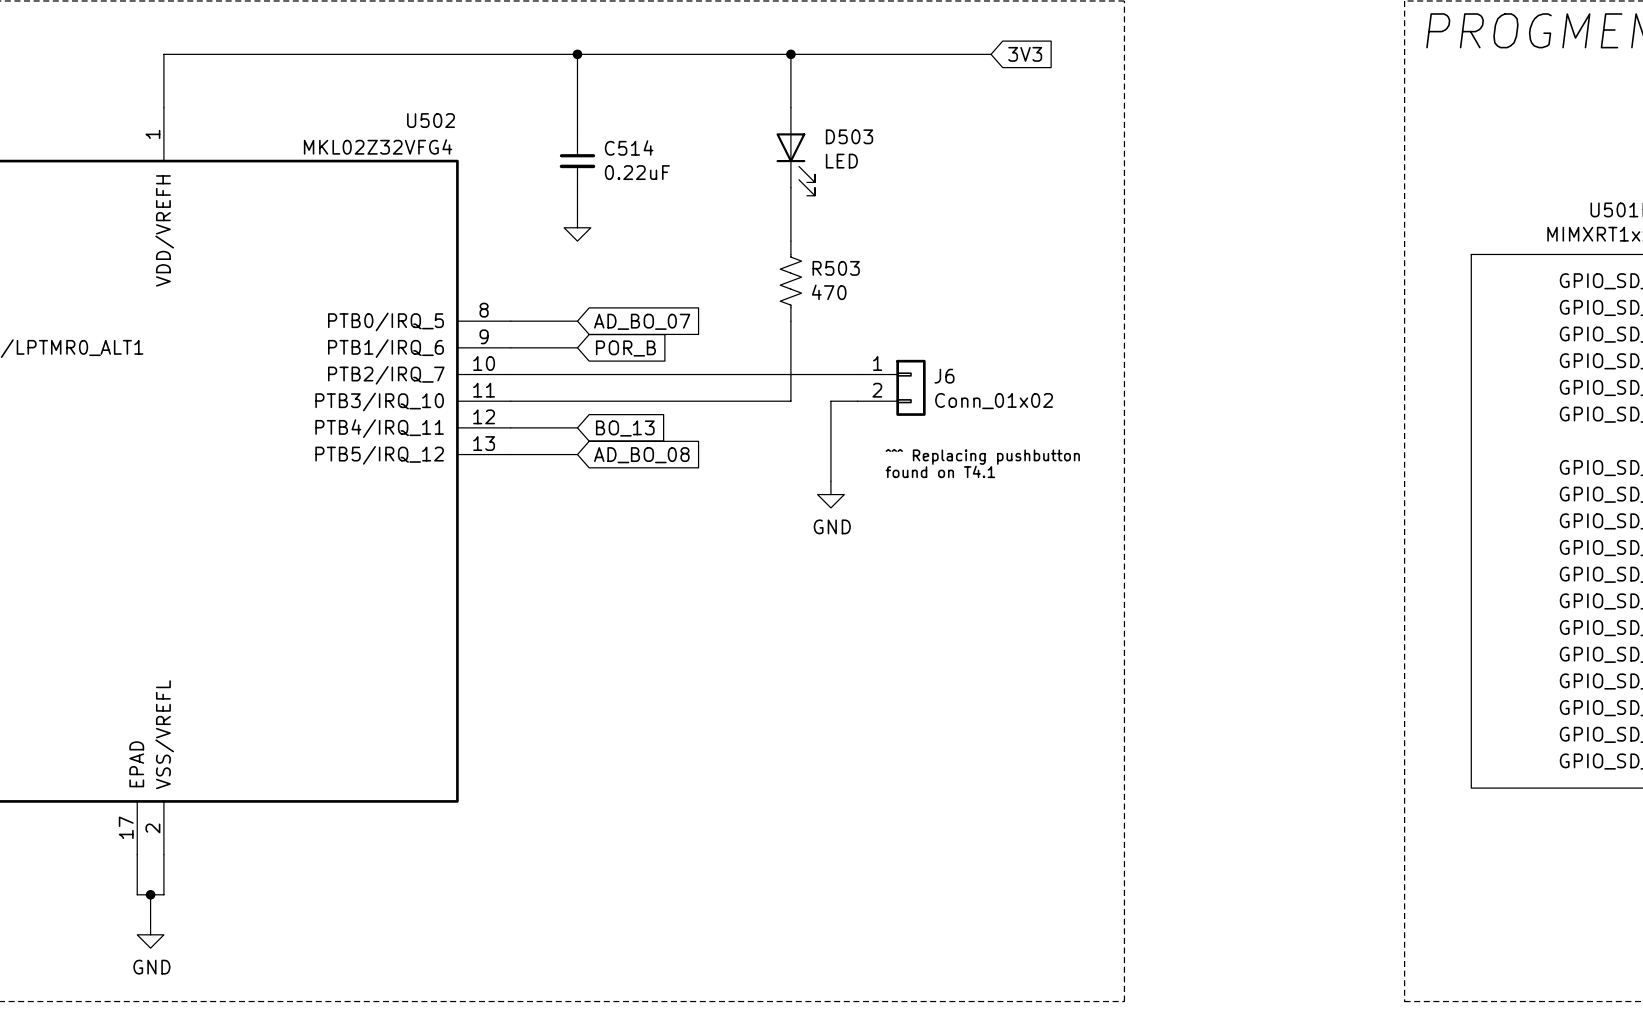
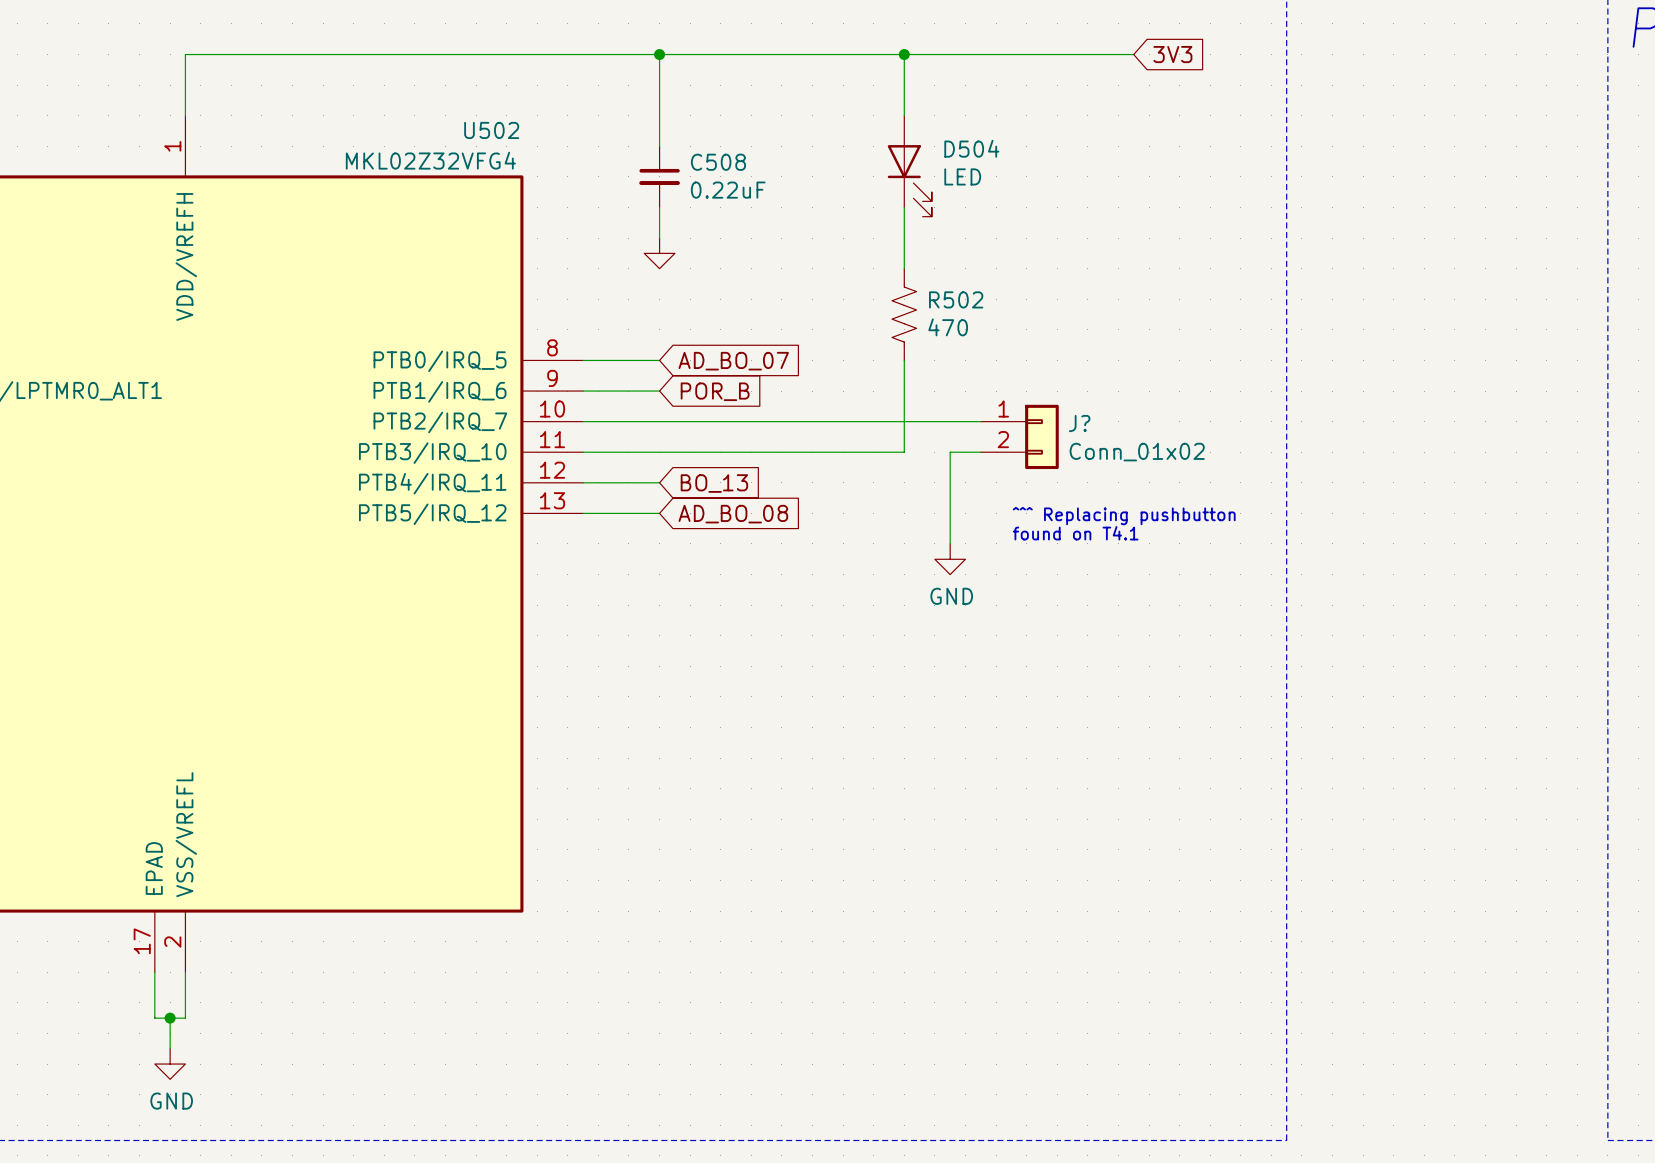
D503 name: D503 (849, 136) -> D504 (971, 148)
C514 name: C514 (629, 147) -> C508 (718, 162)
R503 name: R503 (836, 268) -> R502 (956, 299)
J6 name: J6 (944, 376) -> J? (1079, 423)

